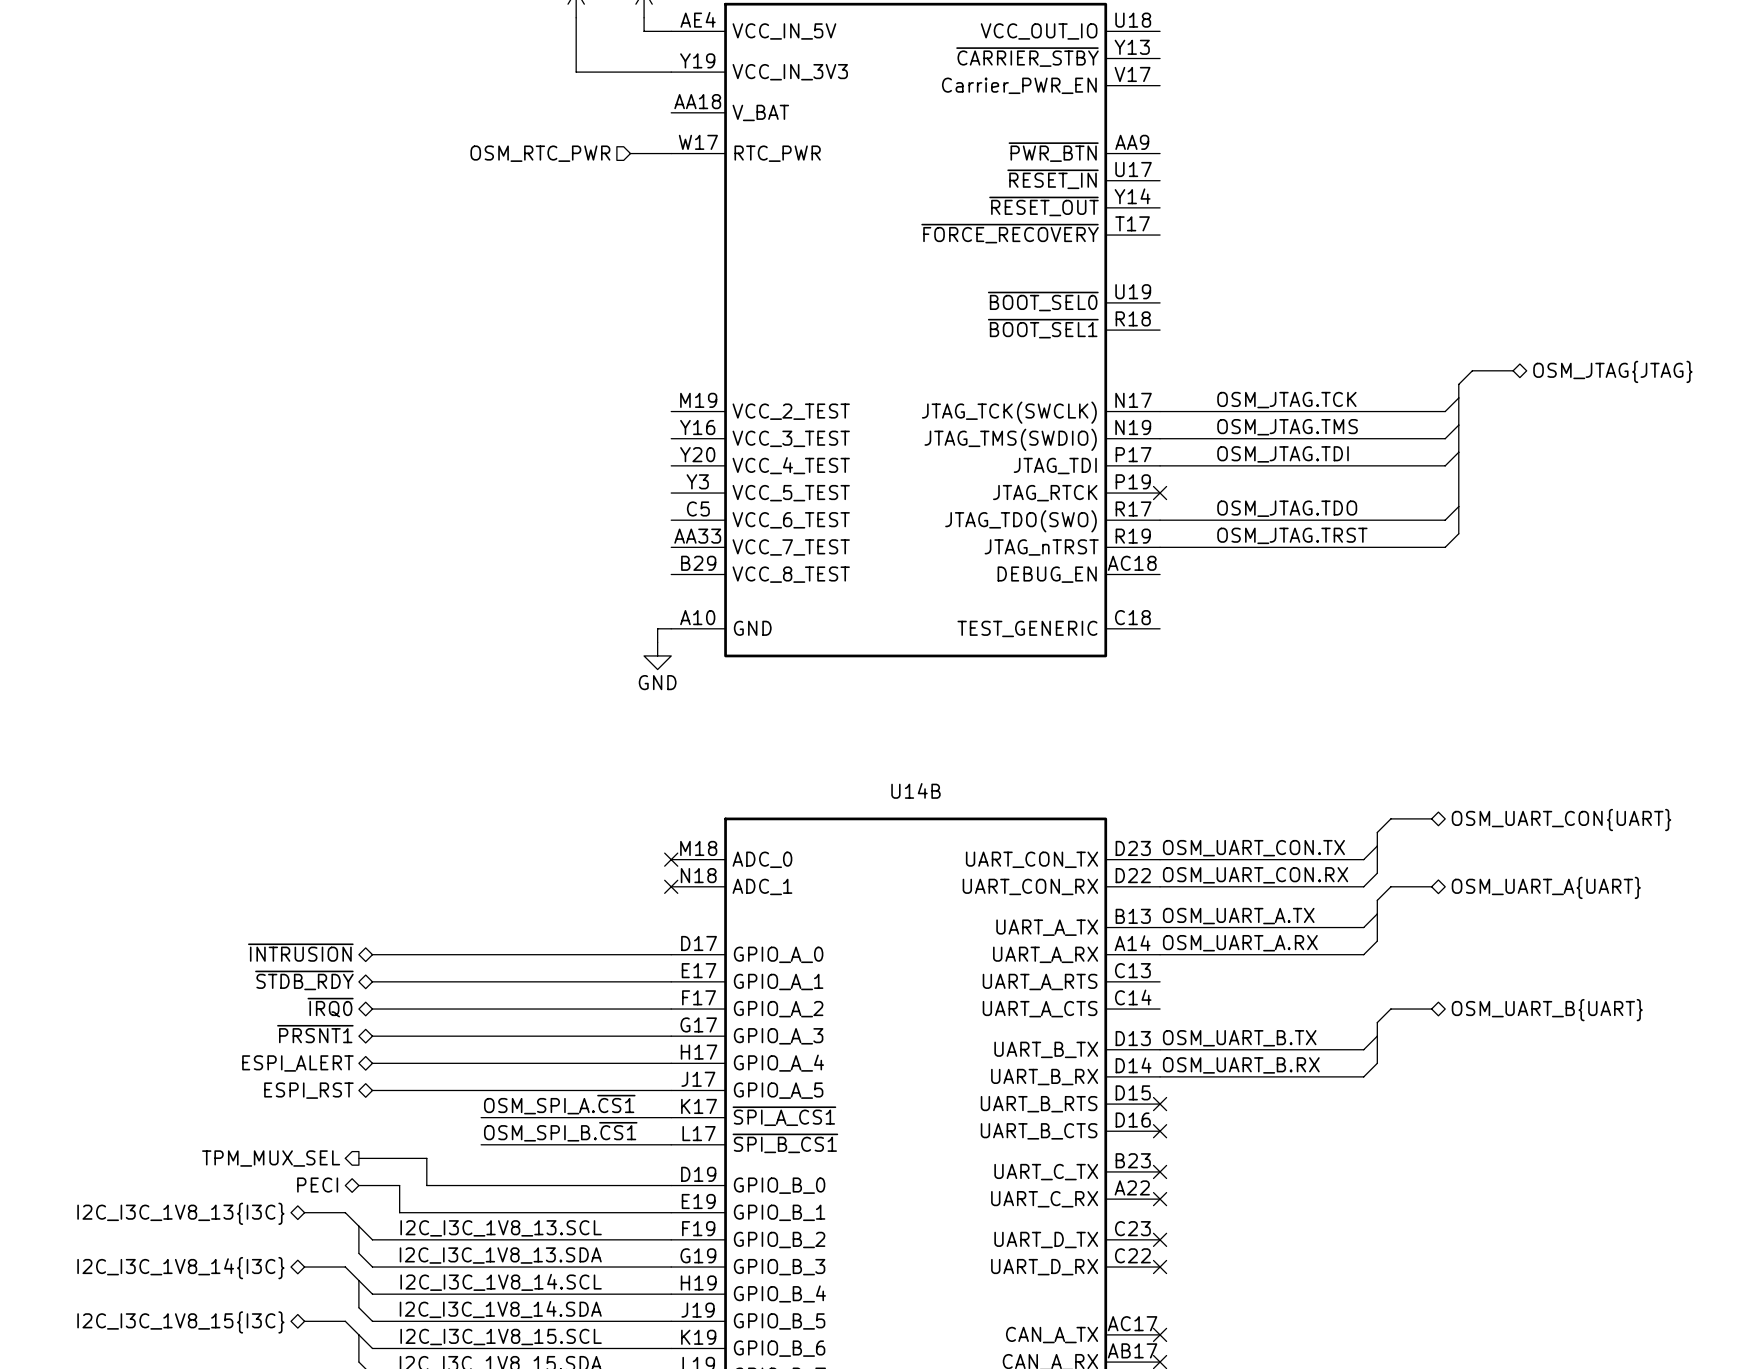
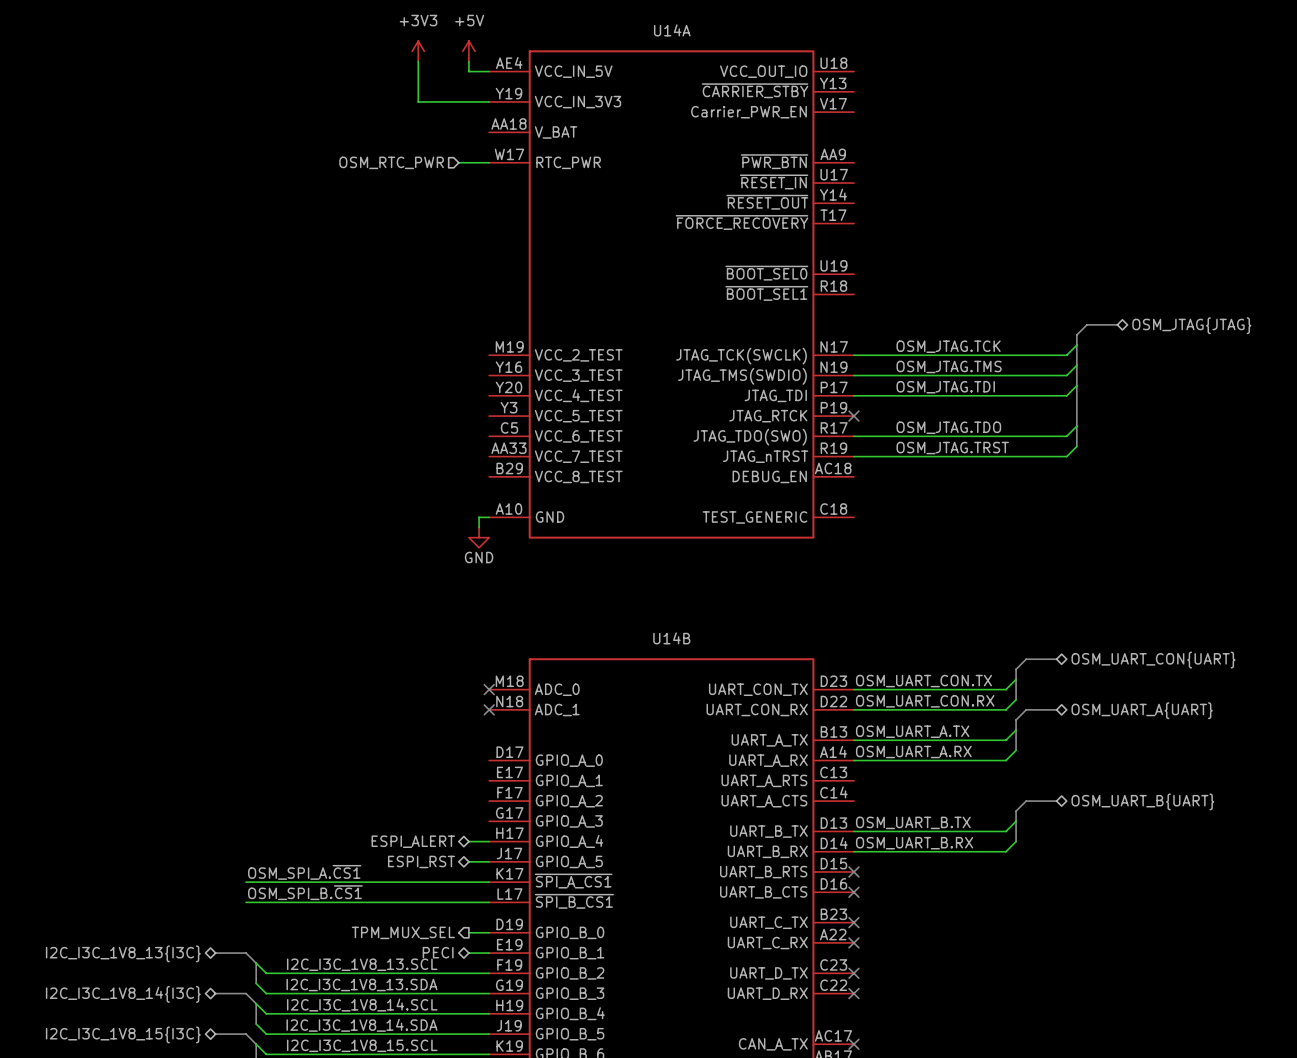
hierarchical label: ~{INTRUSION} (300, 952) -> none
wire: (372, 954) (671, 954) -> none
hierarchical label: ~{STDB_RDY} (304, 980) -> none
wire: (372, 981) (671, 981) -> none
hierarchical label: ~{IRQ0} (330, 1007) -> none
wire: (372, 1009) (671, 1009) -> none
hierarchical label: ~{PRSNT1} (315, 1034) -> none
wire: (372, 1036) (671, 1036) -> none
hierarchical label: ESPI_ALERT (297, 1063) -> none
wire: (372, 1063) (644, 1063) -> none
hierarchical label: none -> ESPI_ALERT (413, 841)
hierarchical label: ESPI_RST (308, 1090) -> none
wire: (372, 1090) (644, 1090) -> none
hierarchical label: none -> ESPI_RST (421, 861)
label position: OSM_SPI_A.~{CS1} (559, 1104) -> OSM_SPI_A.~{CS1} (304, 872)
wire: none -> (246, 882) (347, 882)
label position: OSM_SPI_B.~{CS1} (560, 1131) -> OSM_SPI_B.~{CS1} (305, 892)
wire: none -> (246, 902) (347, 902)
hierarchical label: TPM_MUX_SEL (271, 1158) -> none
wire: (358, 1158) (426, 1158) (426, 1185) (644, 1185) -> none
hierarchical label: PECI (317, 1185) -> none
wire: (358, 1185) (399, 1185) (399, 1212) (644, 1212) -> none
hierarchical label: none -> TPM_MUX_SEL (403, 932)
hierarchical label: none -> PECI (438, 952)

